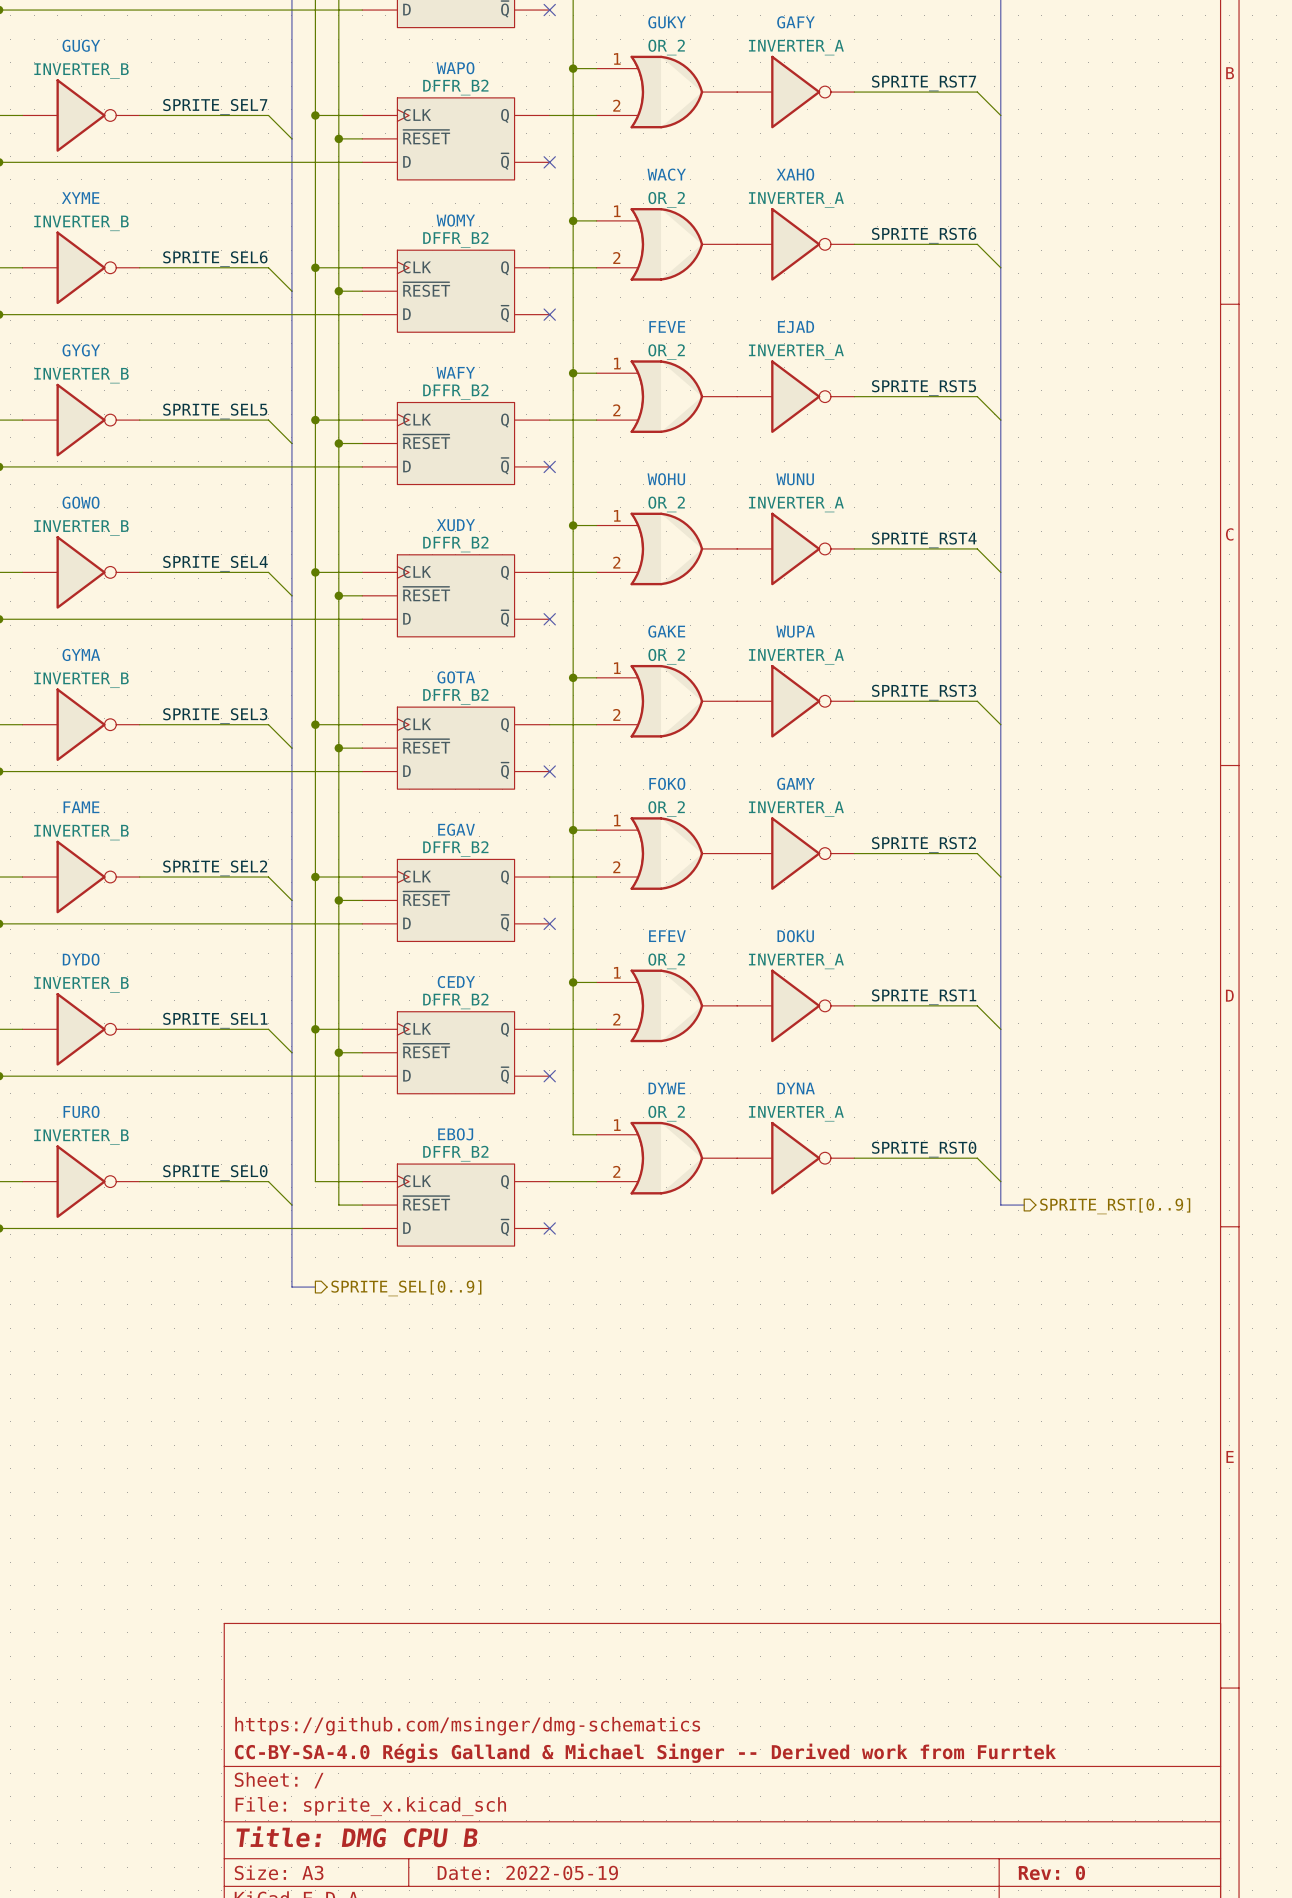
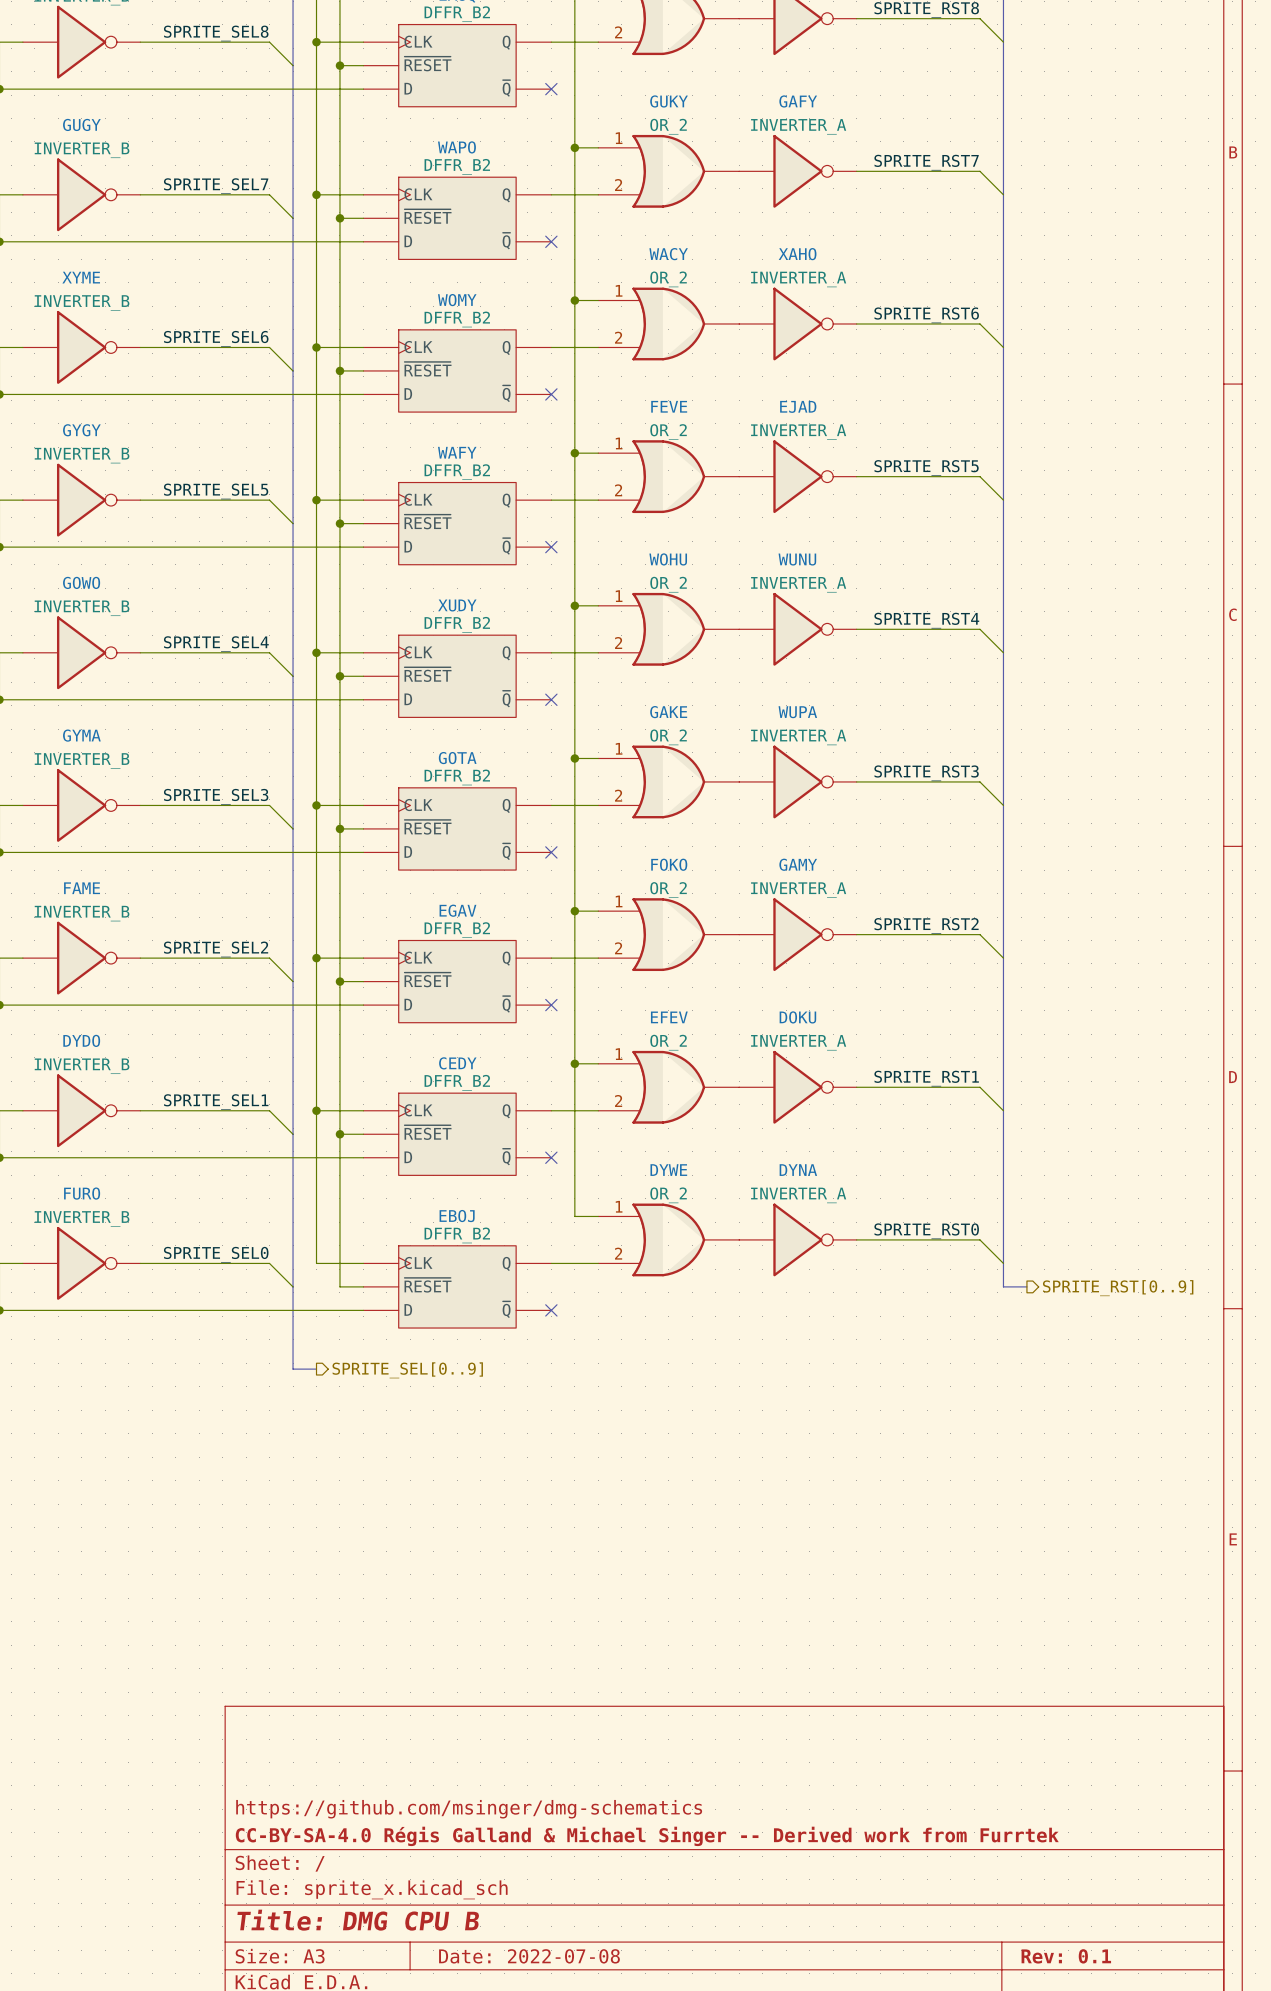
title block: Date: 2022-05-19 (527, 1872) -> Date: 2022-07-08 (529, 1956)
title block: Rev: 0 (1051, 1872) -> Rev: 0.1 (1066, 1956)

